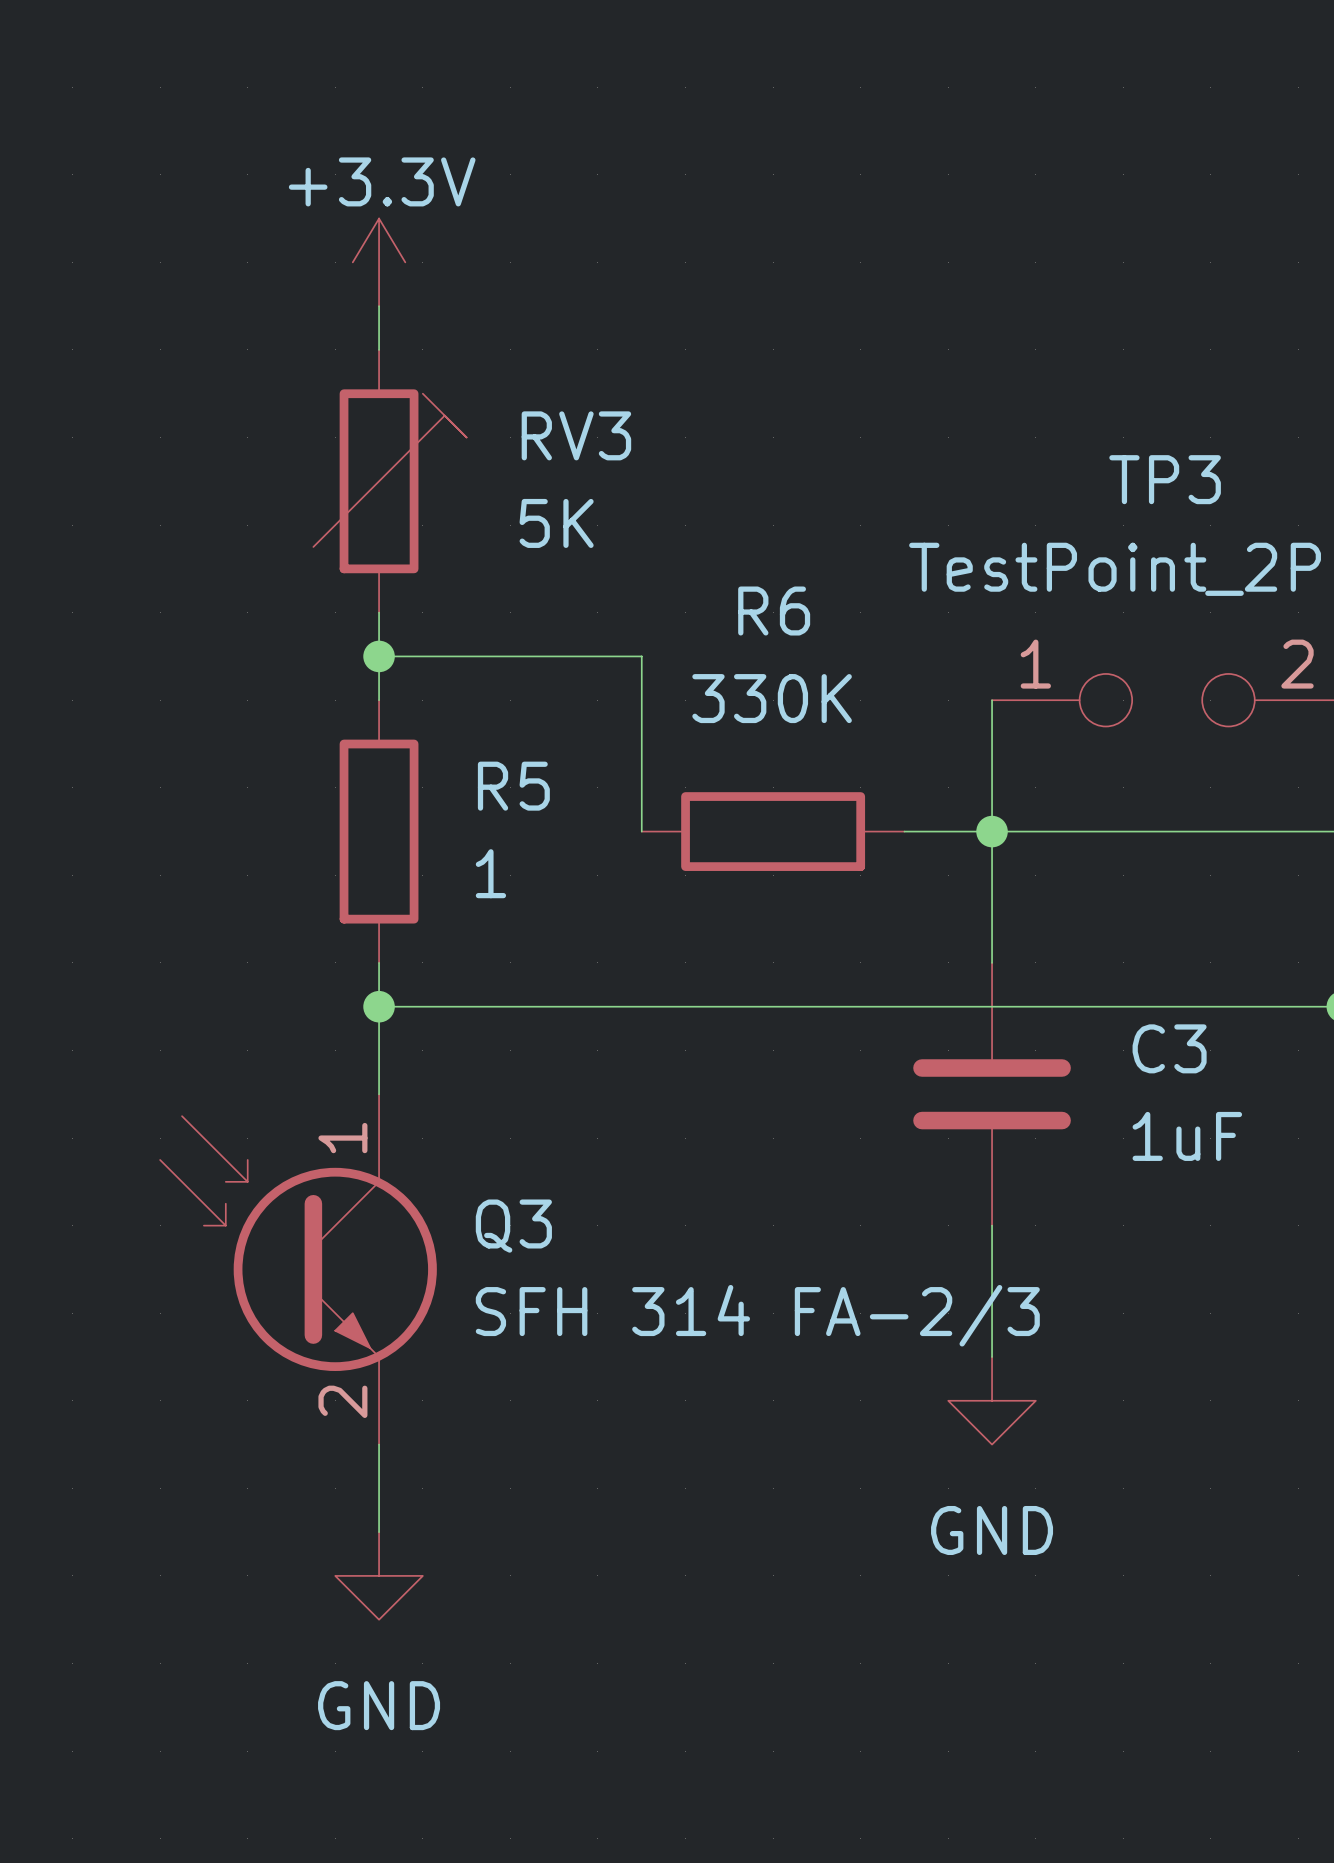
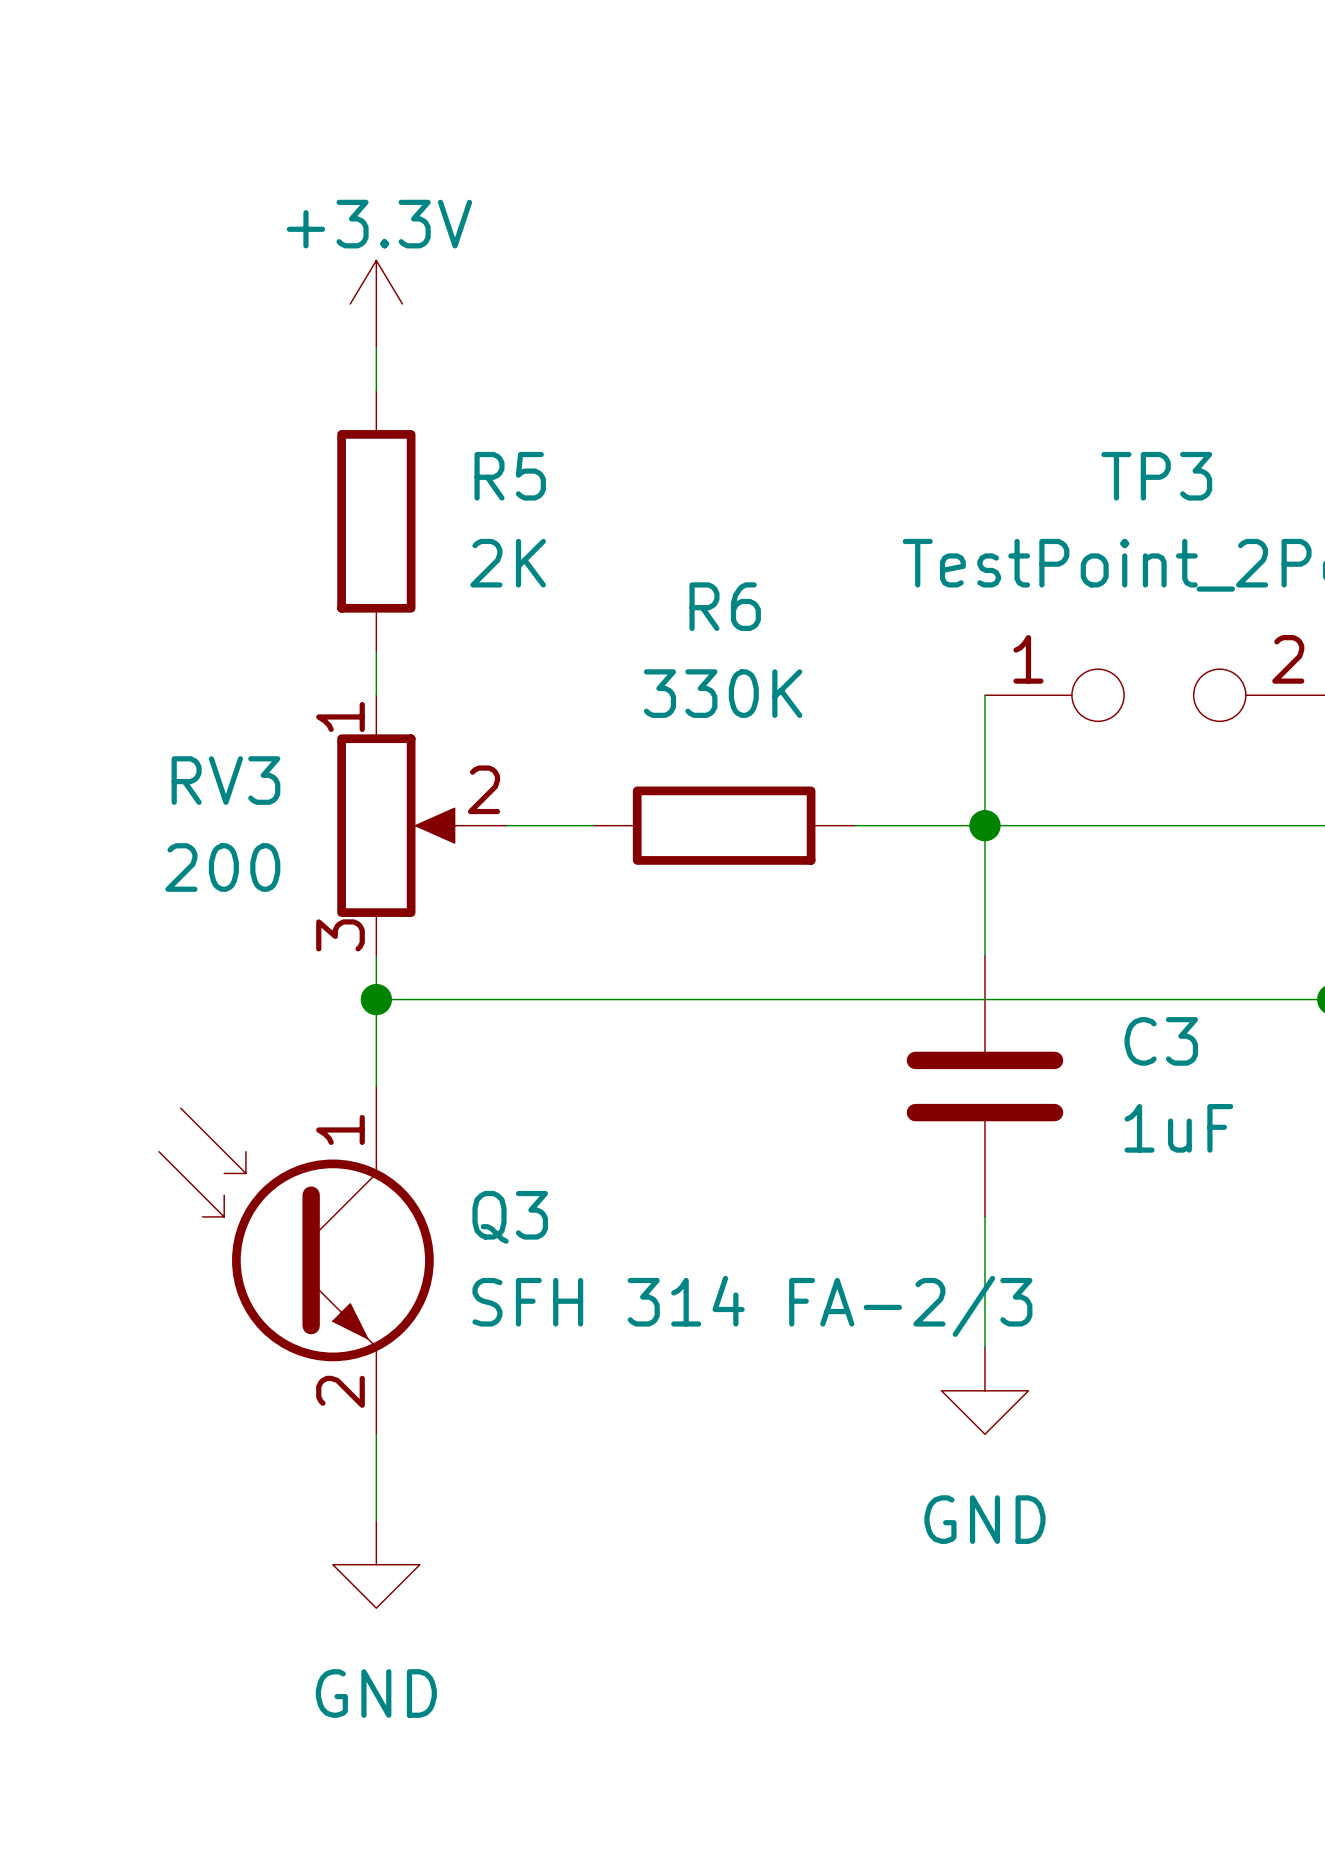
power symbol position: +3.3V (379, 262) -> +3.3V (376, 303)
RV3 symbol: [313, 349, 467, 613] -> [337, 695, 507, 957]
RV3 name position: RV3 (576, 435) -> RV3 (225, 780)
RV3 value: 5K (556, 523) -> 200 (222, 867)
wire: (379, 612) (379, 656) (641, 656) (641, 831) -> none
junction: (379, 656) -> none
R5 position: (379, 831) -> (376, 521)
wire: none -> (506, 825) (593, 825)
R6 position: (773, 831) -> (724, 825)
R5 value: 1 (490, 873) -> 2K (508, 563)

